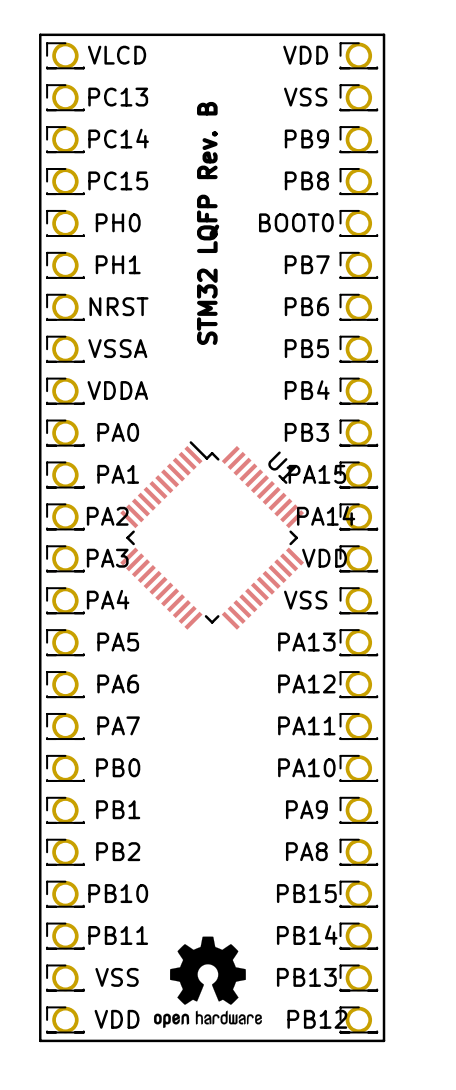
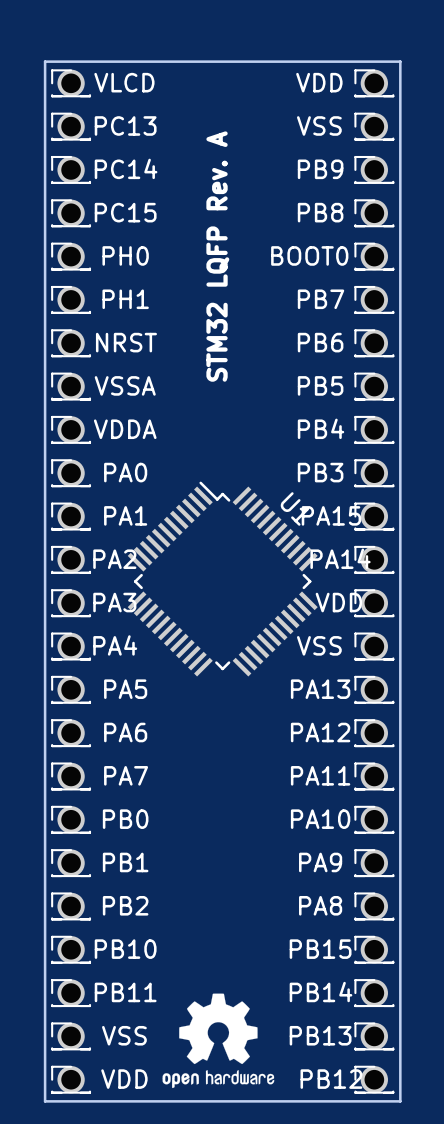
text: STM32 LQFP Rev. B (208, 223) -> STM32 LQFP Rev. A (217, 256)

